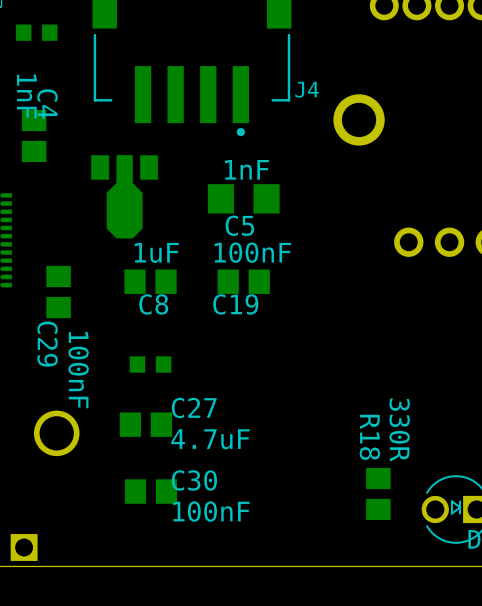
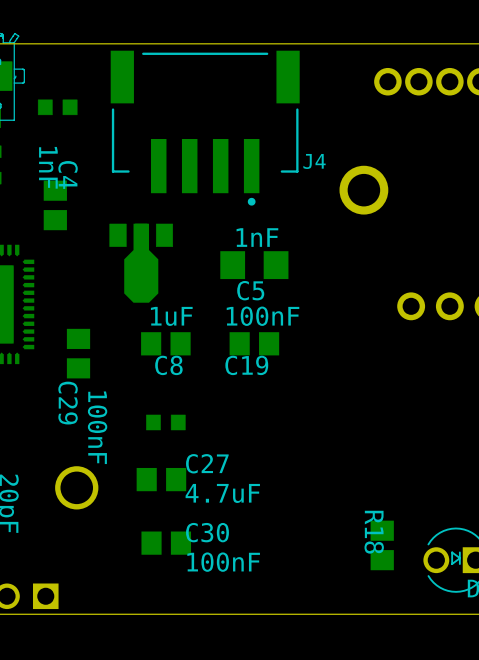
R18 value: 330R (399, 430) -> none
R18 name position: R18 (369, 437) -> R18 (374, 532)

